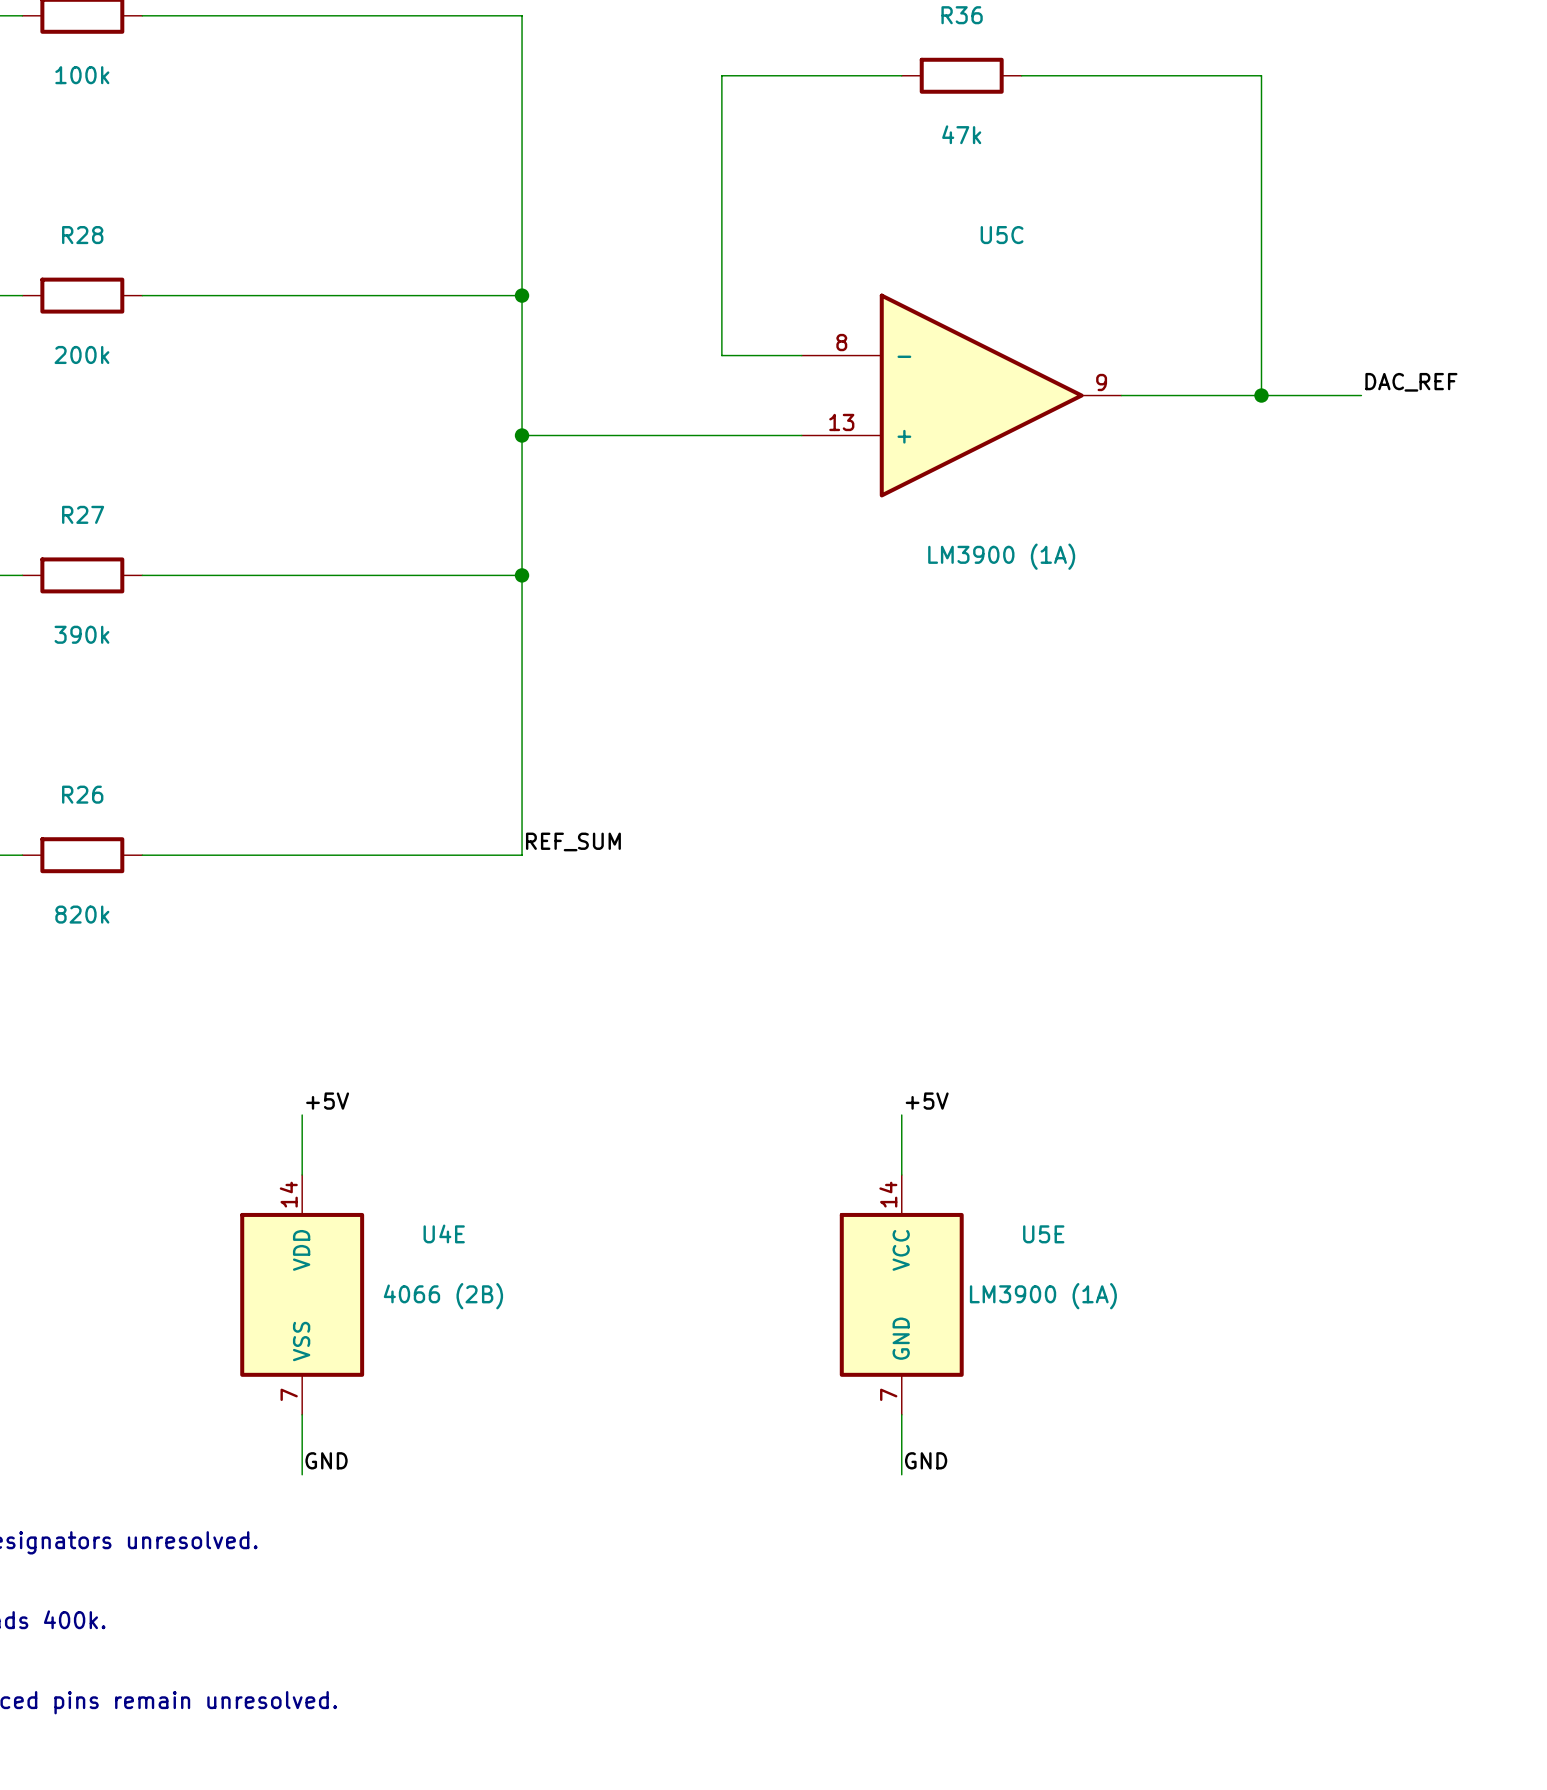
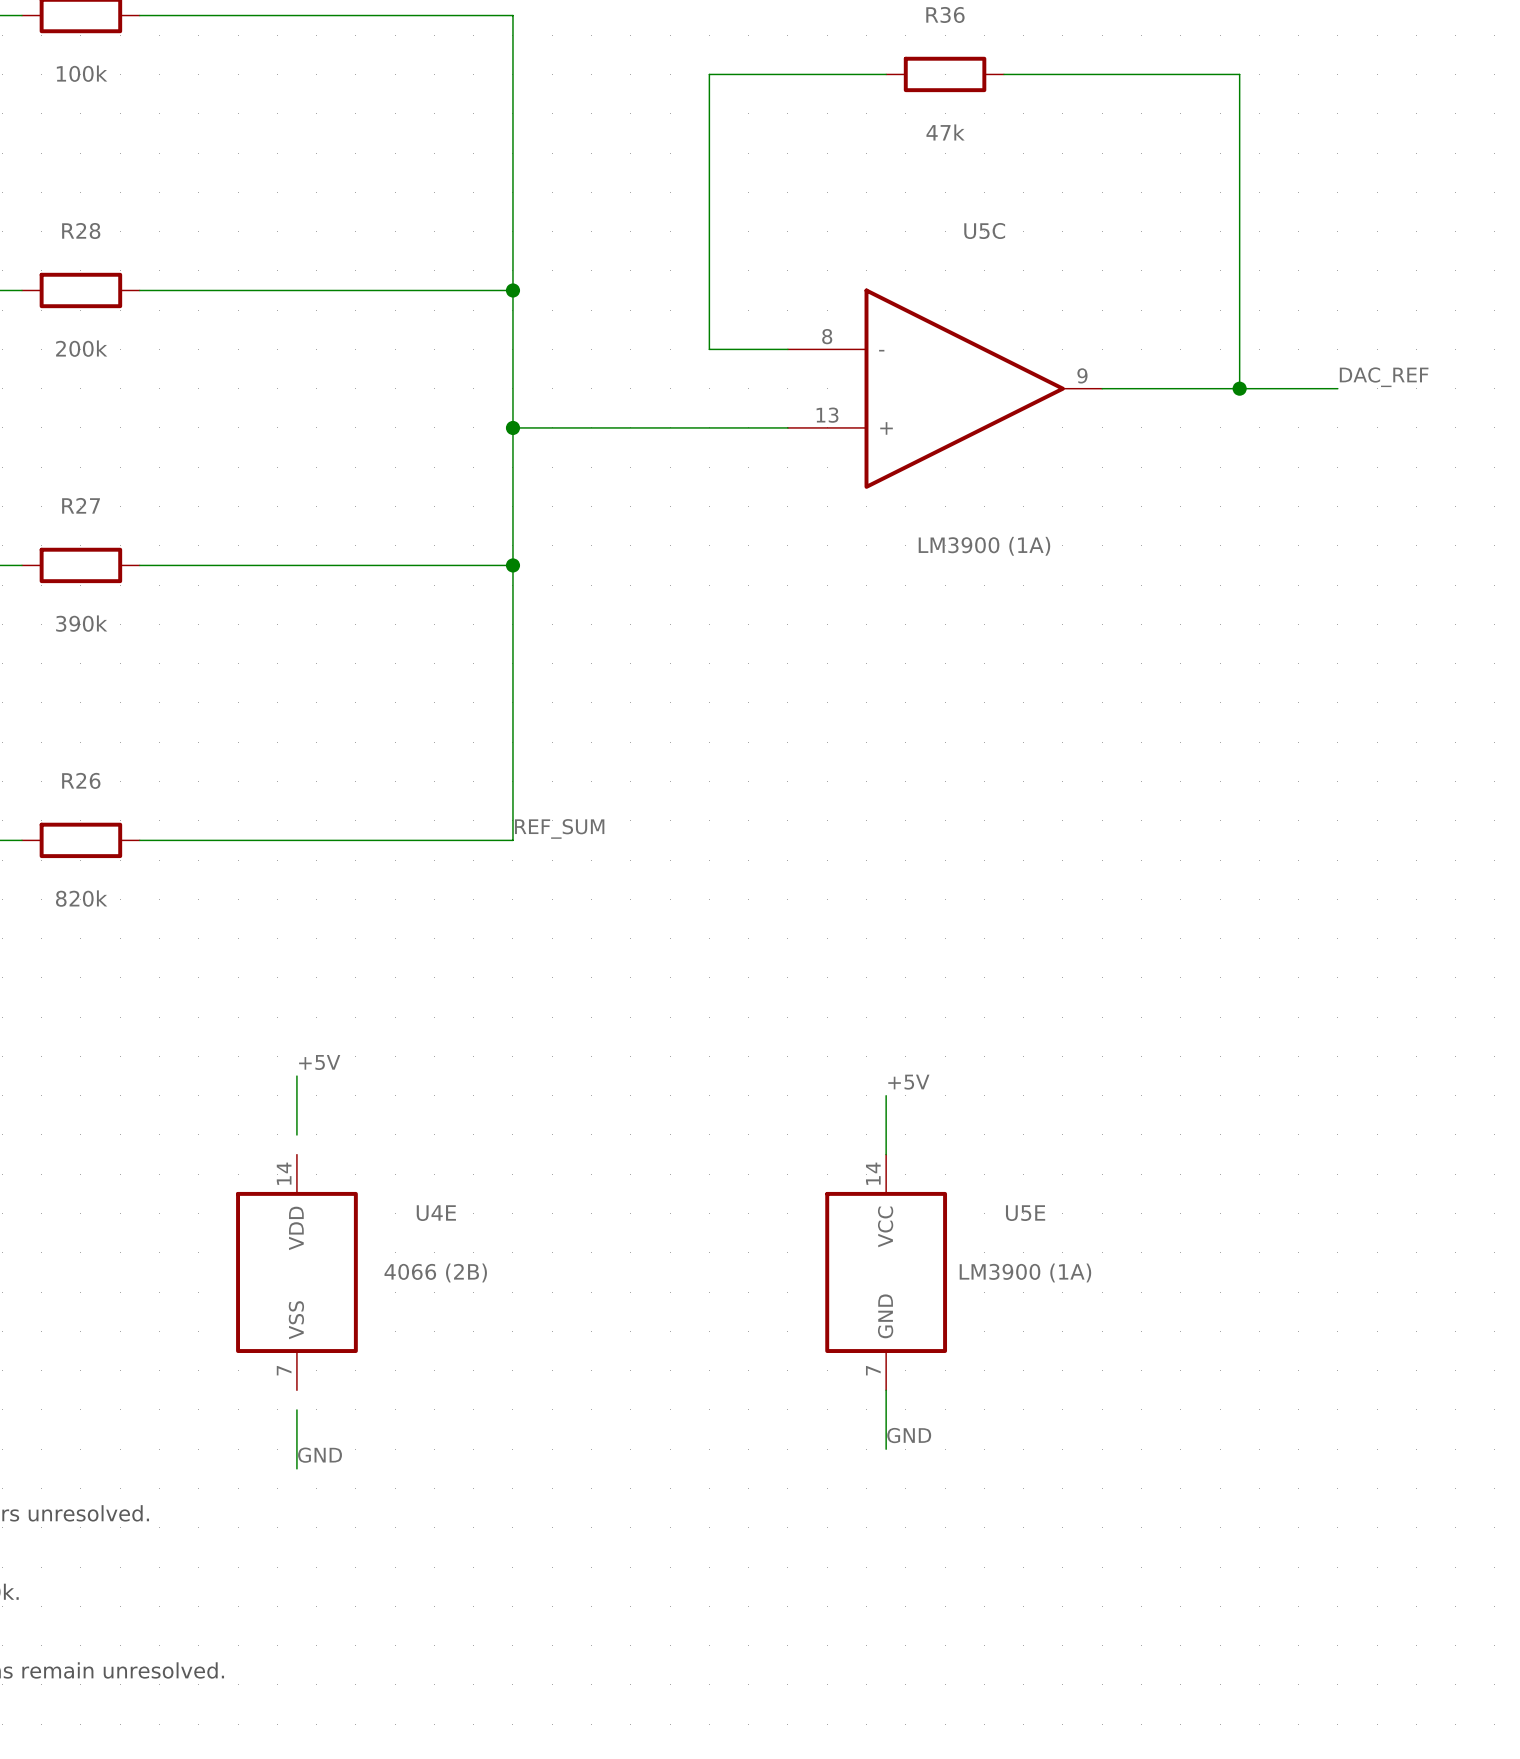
label position: +5V (327, 1101) -> +5V (319, 1062)
wire: (302, 1154) (302, 1174) -> (296, 1076) (296, 1095)
wire: (302, 1414) (302, 1434) -> (296, 1449) (296, 1468)
label position: GND (326, 1460) -> GND (320, 1455)

